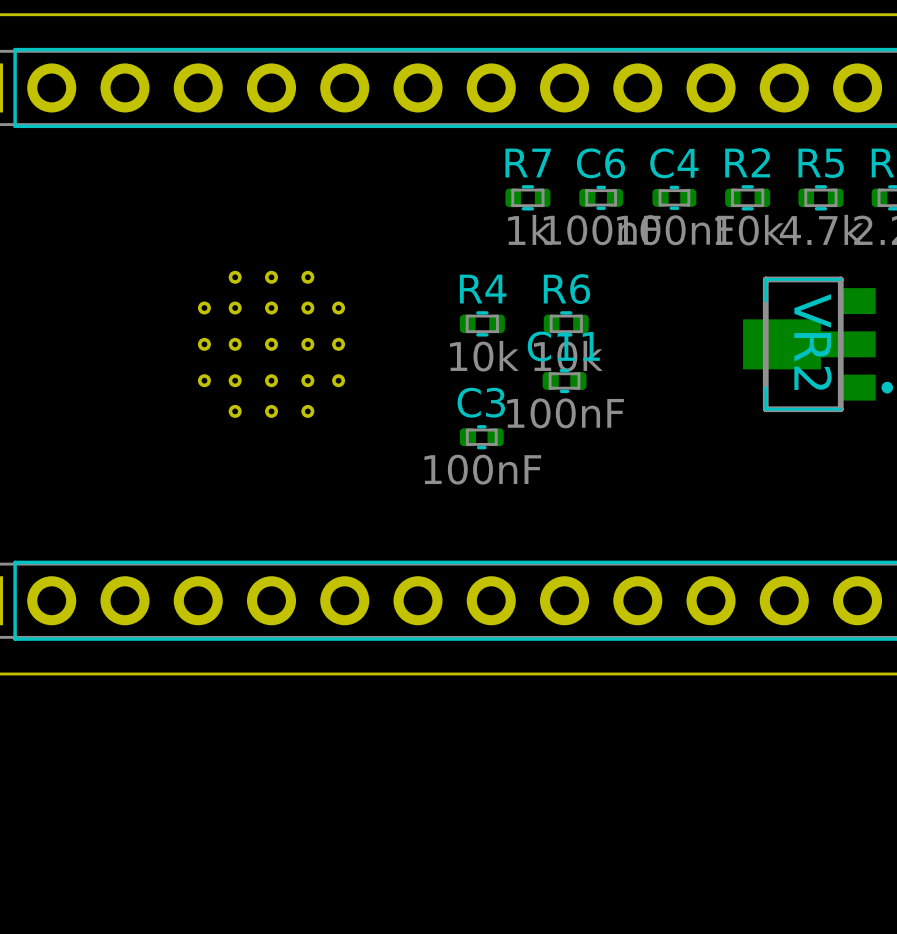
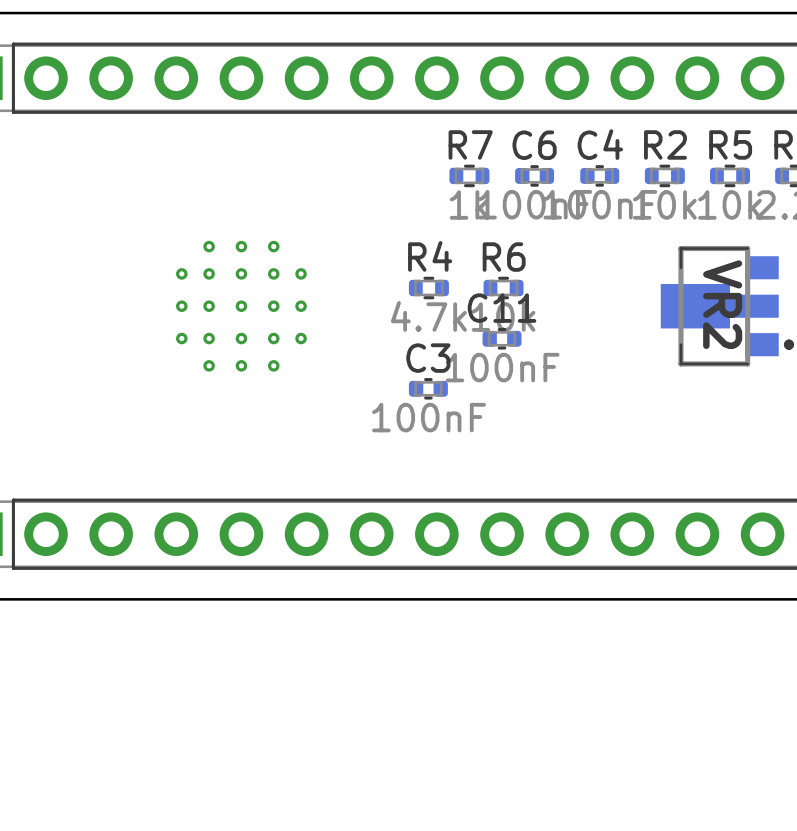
R5 value: 4.7k (821, 229) -> 10k (730, 204)
R4 value: 10k (484, 356) -> 4.7k (428, 316)

